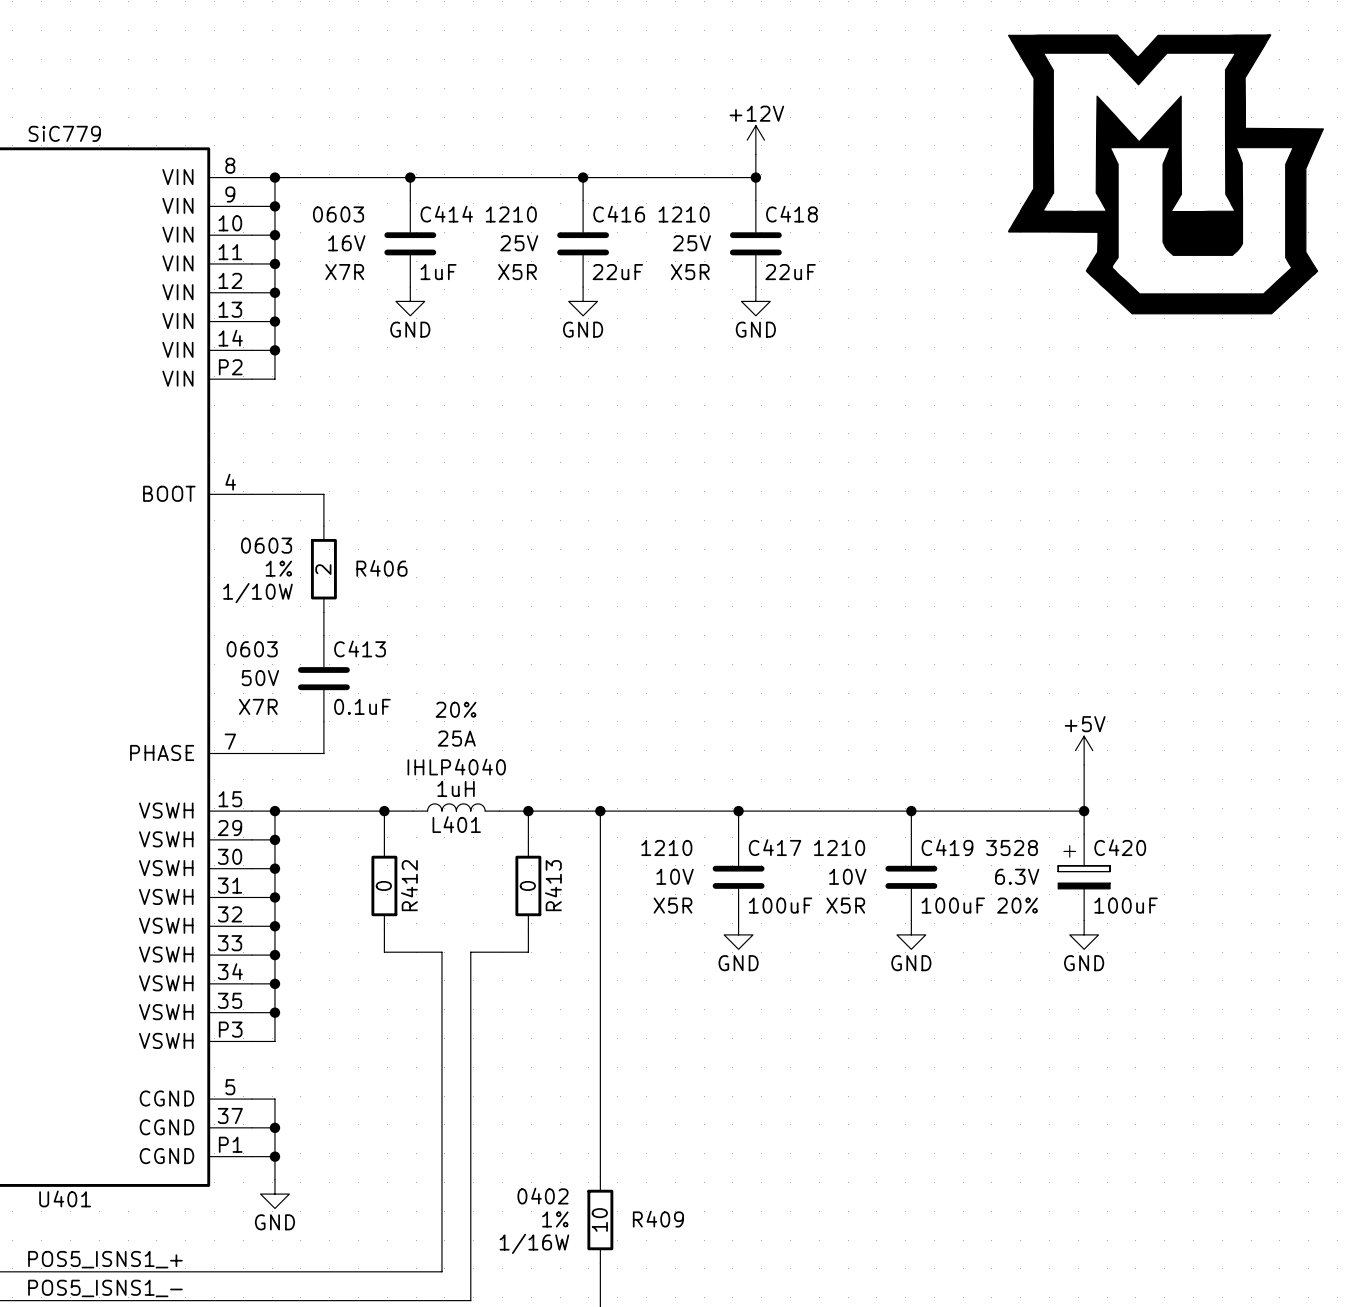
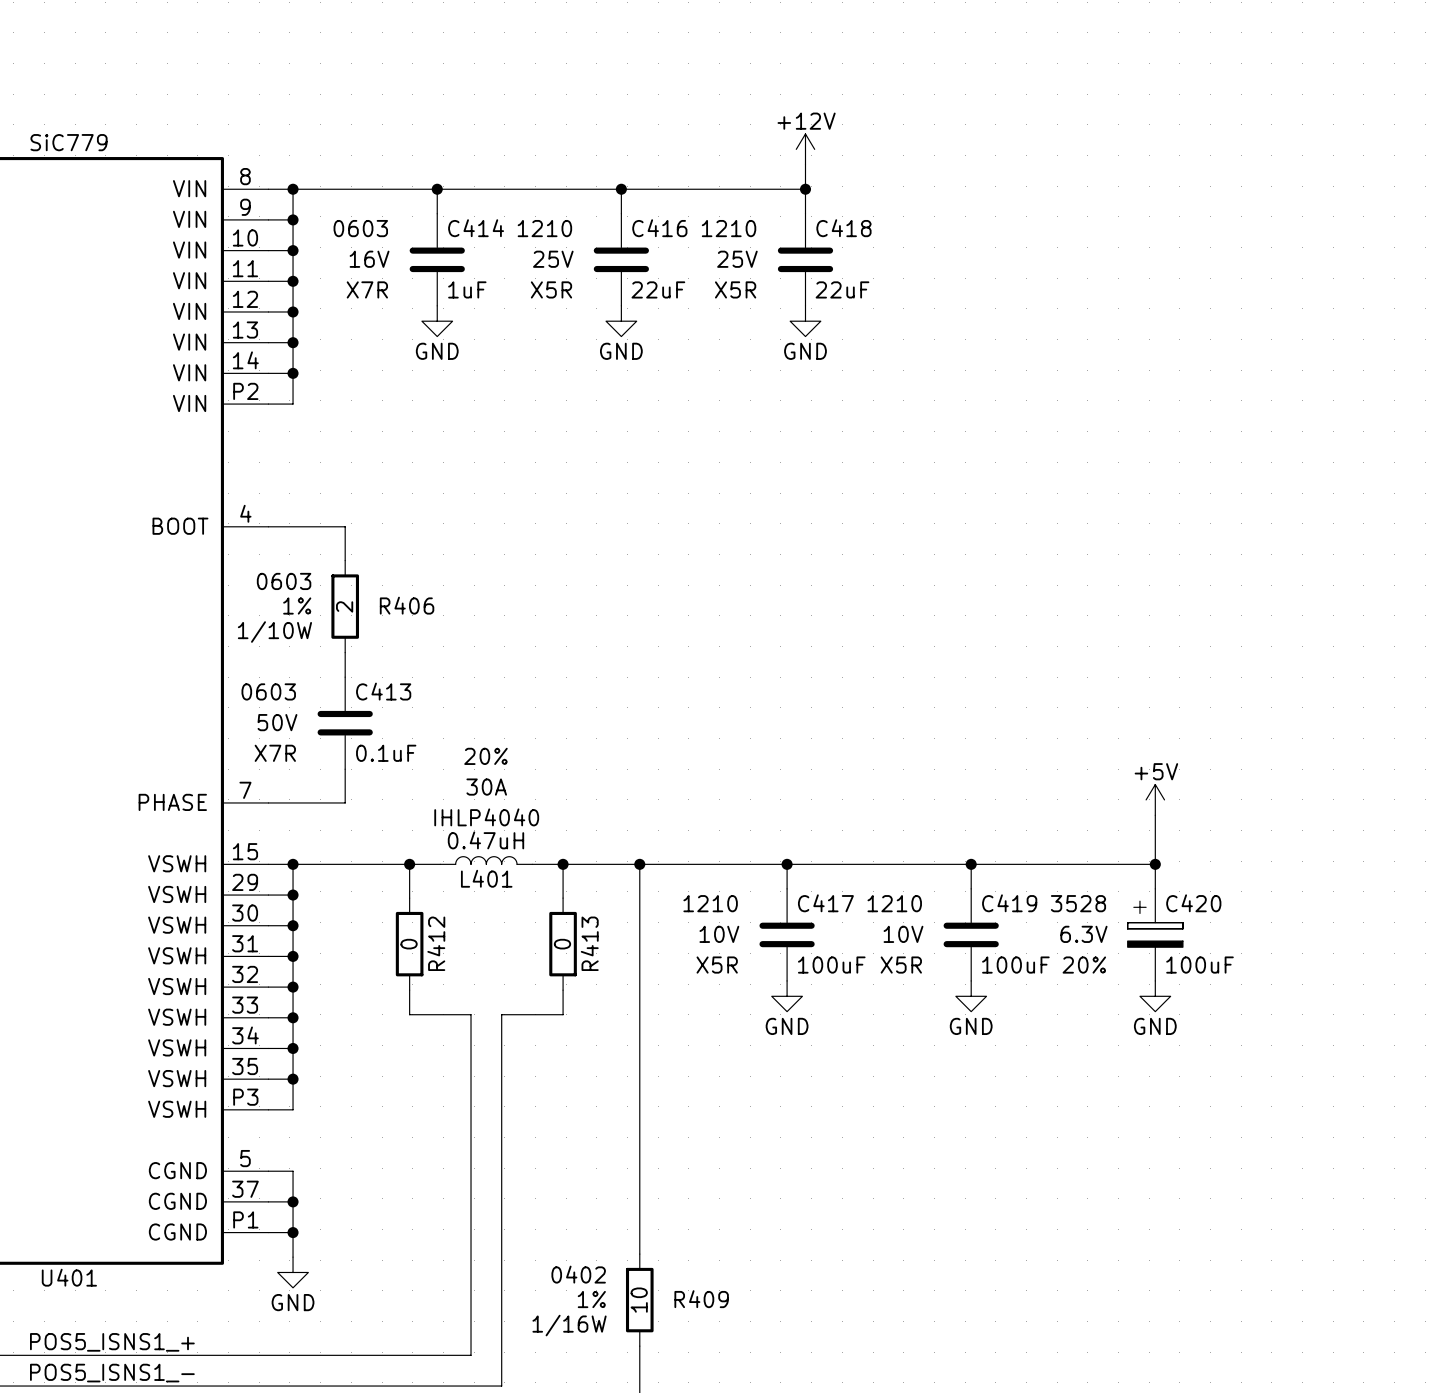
power symbol: (1166, 174) -> none
L401 text: 25A (456, 738) -> 30A (486, 787)
L401 value: 1uH (456, 788) -> 0.47uH (485, 840)

